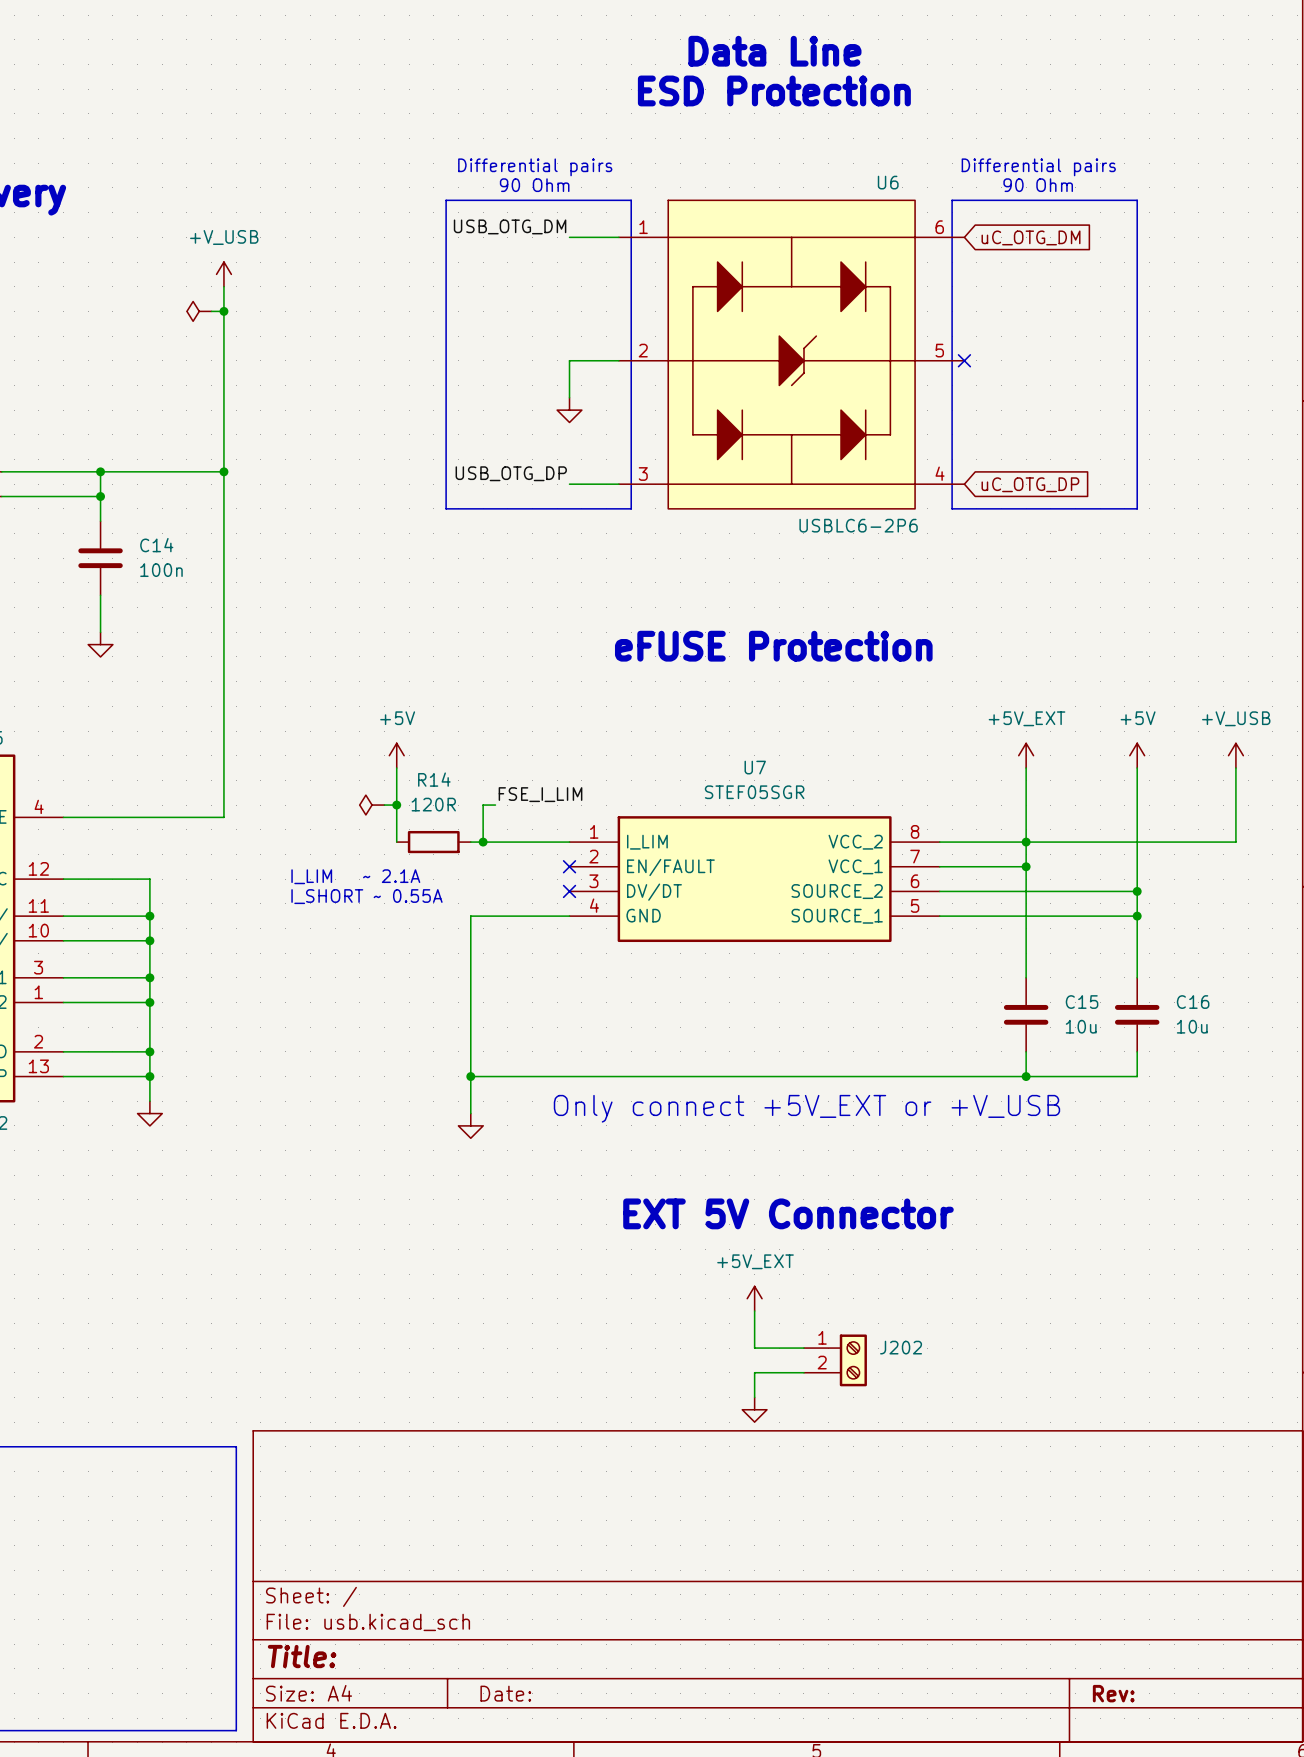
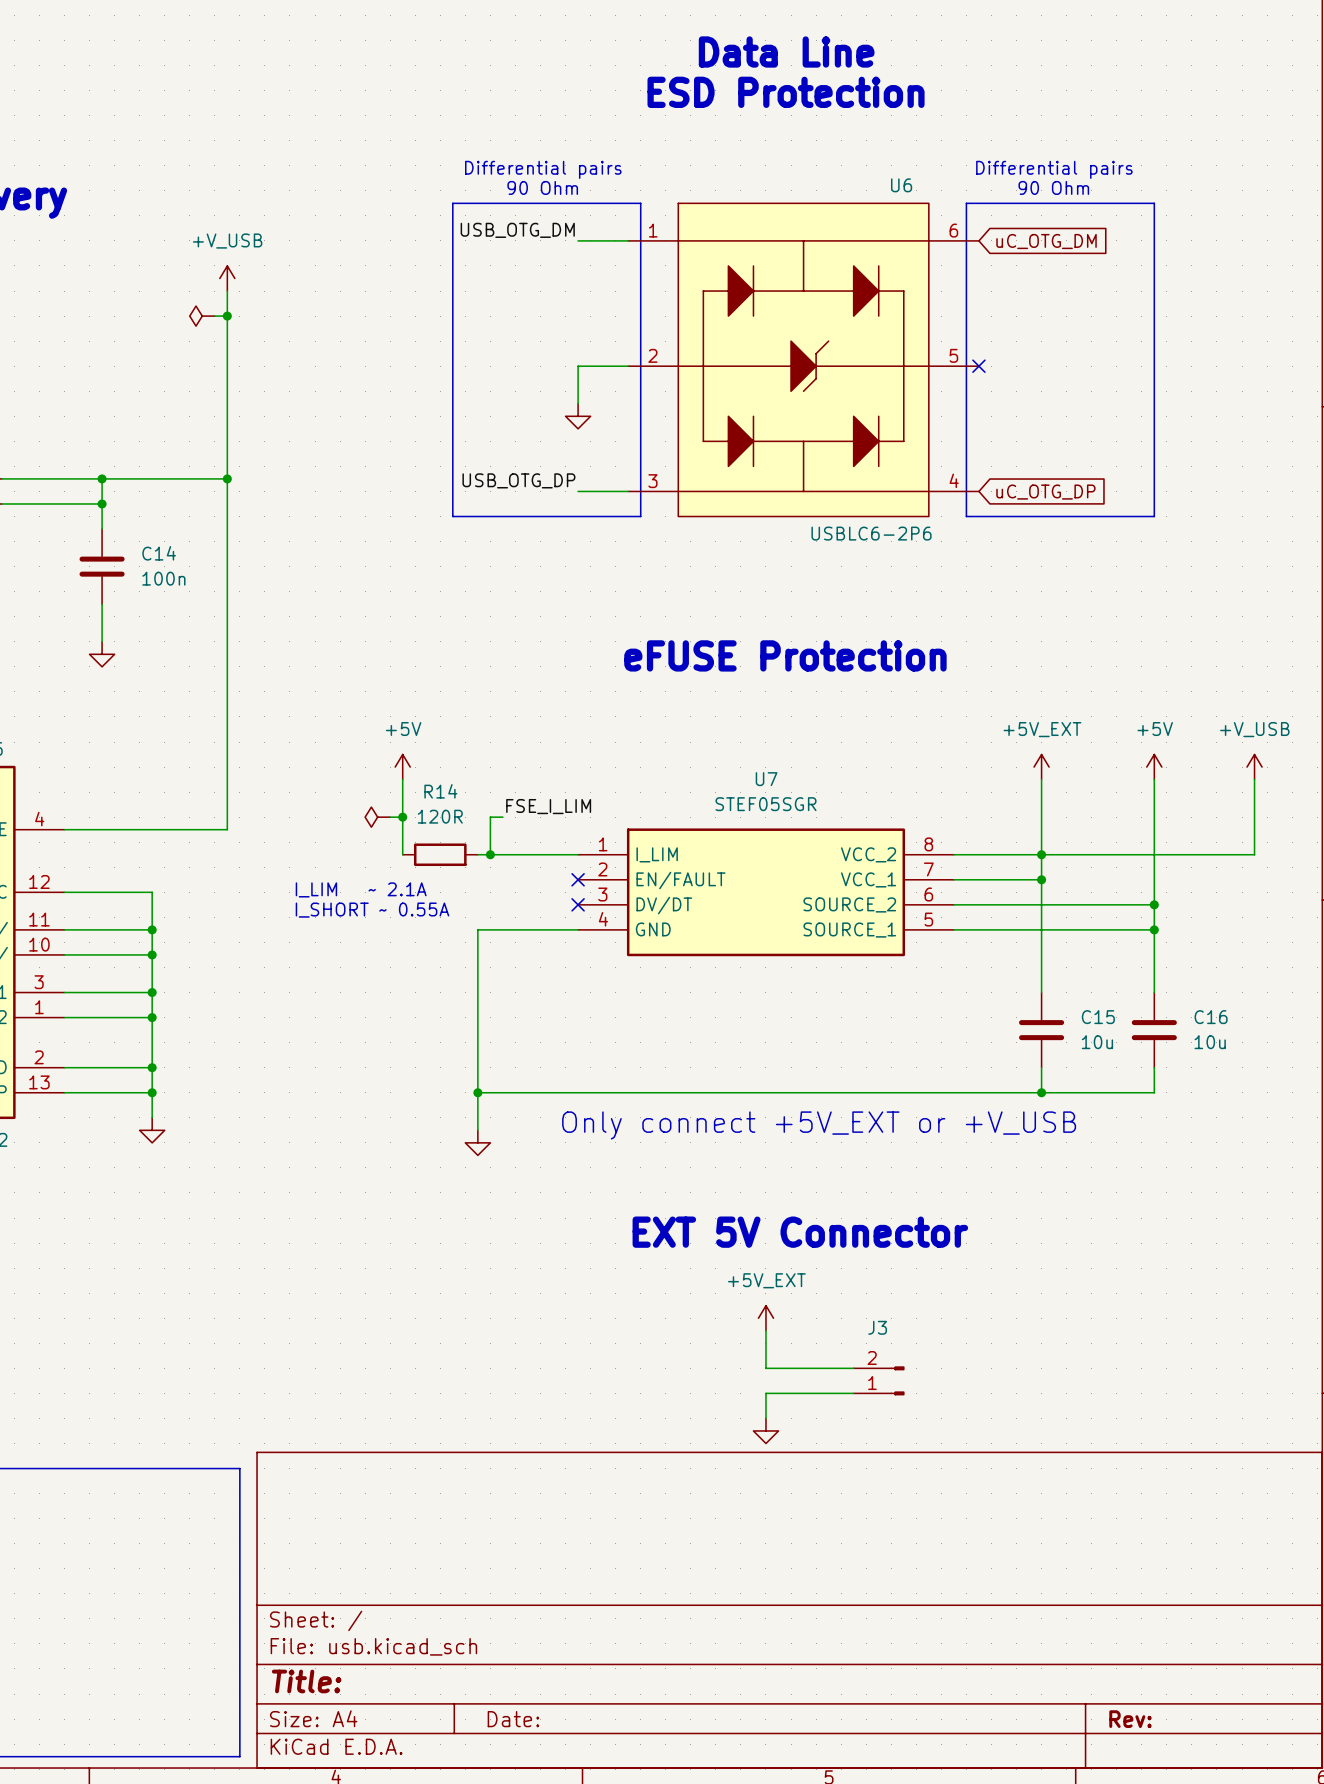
J202: (835, 1360) -> none
J3: none -> (879, 1380)

